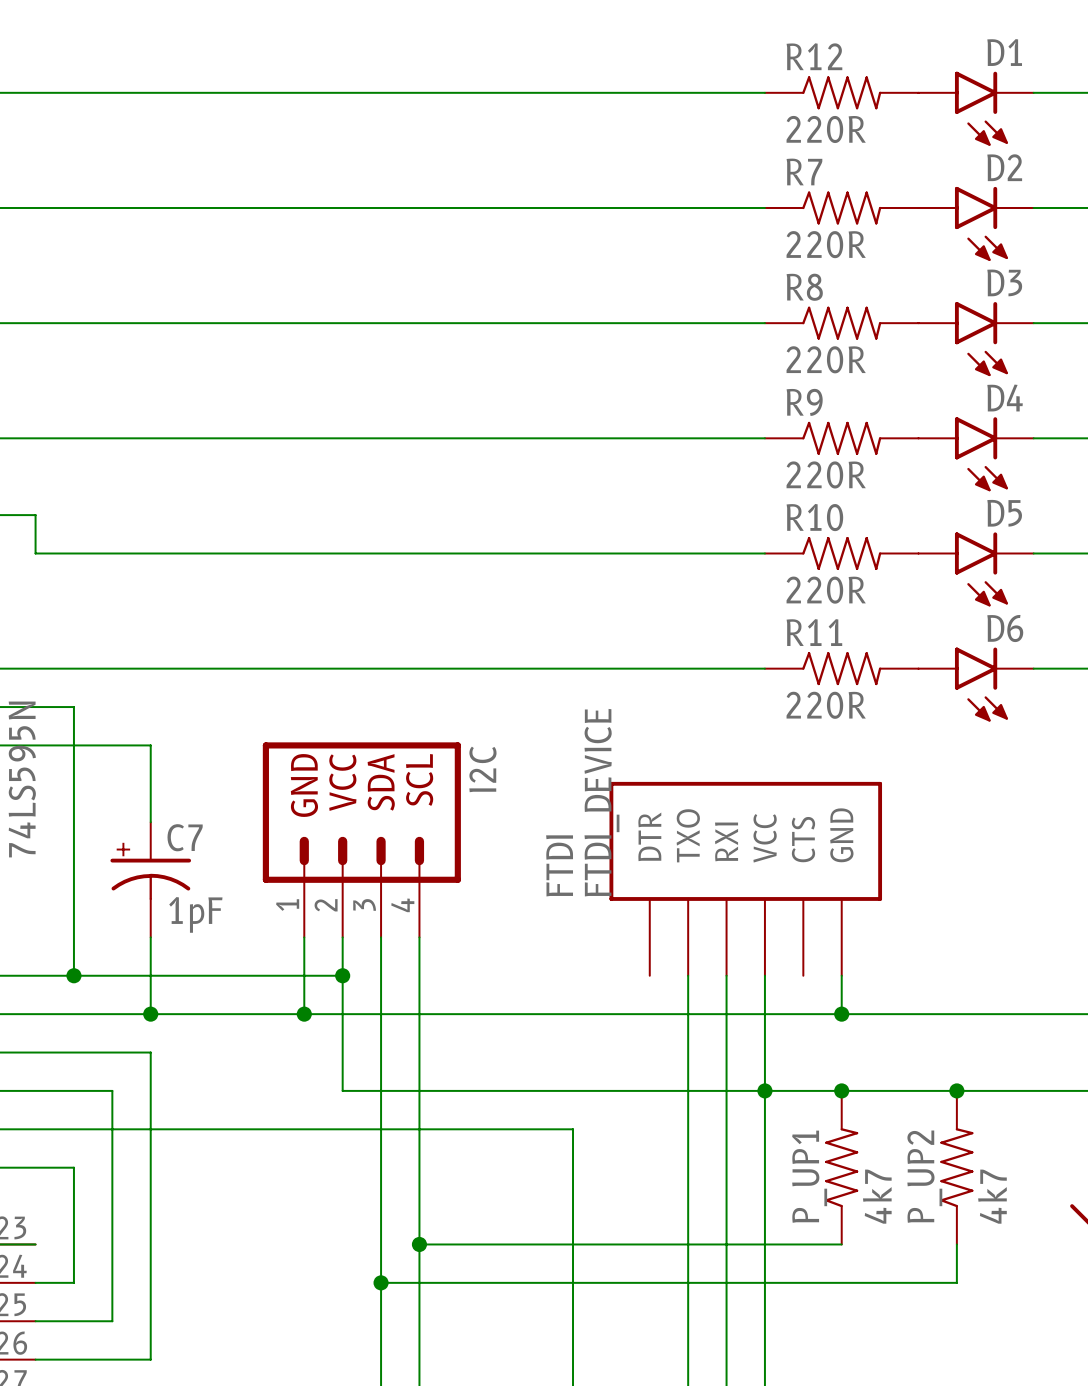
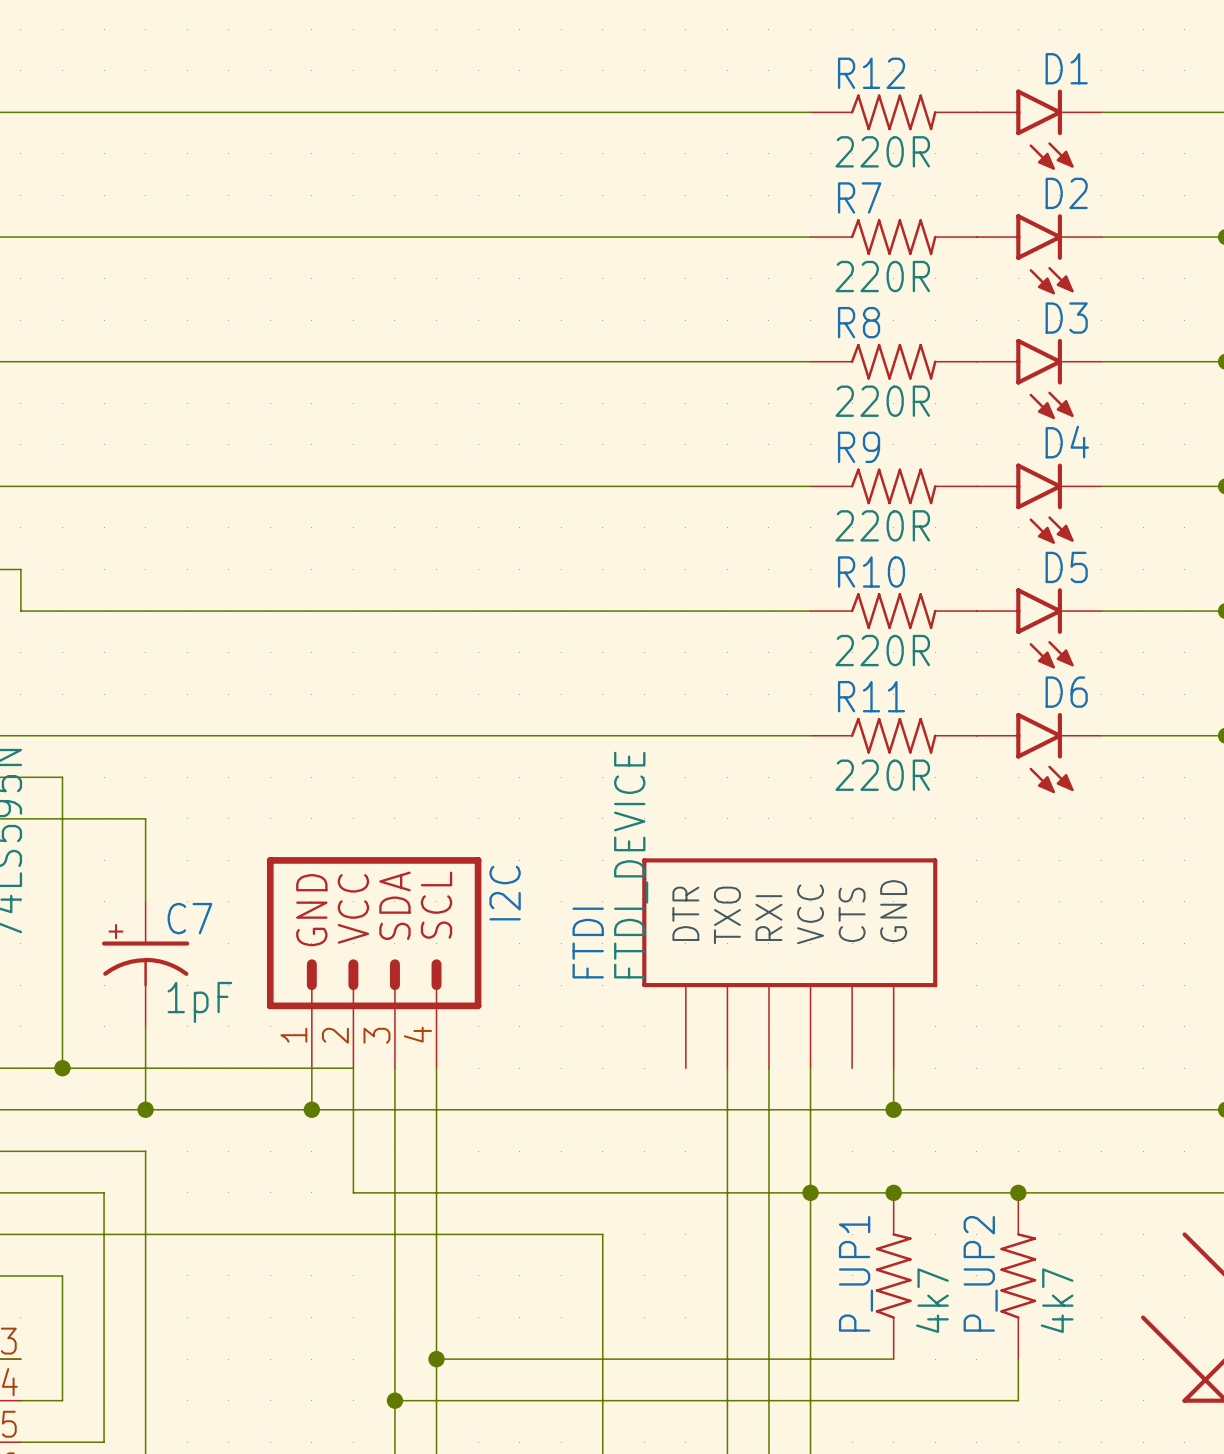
I2C position: (361, 839) -> (374, 962)
junction: (342, 975) -> none

